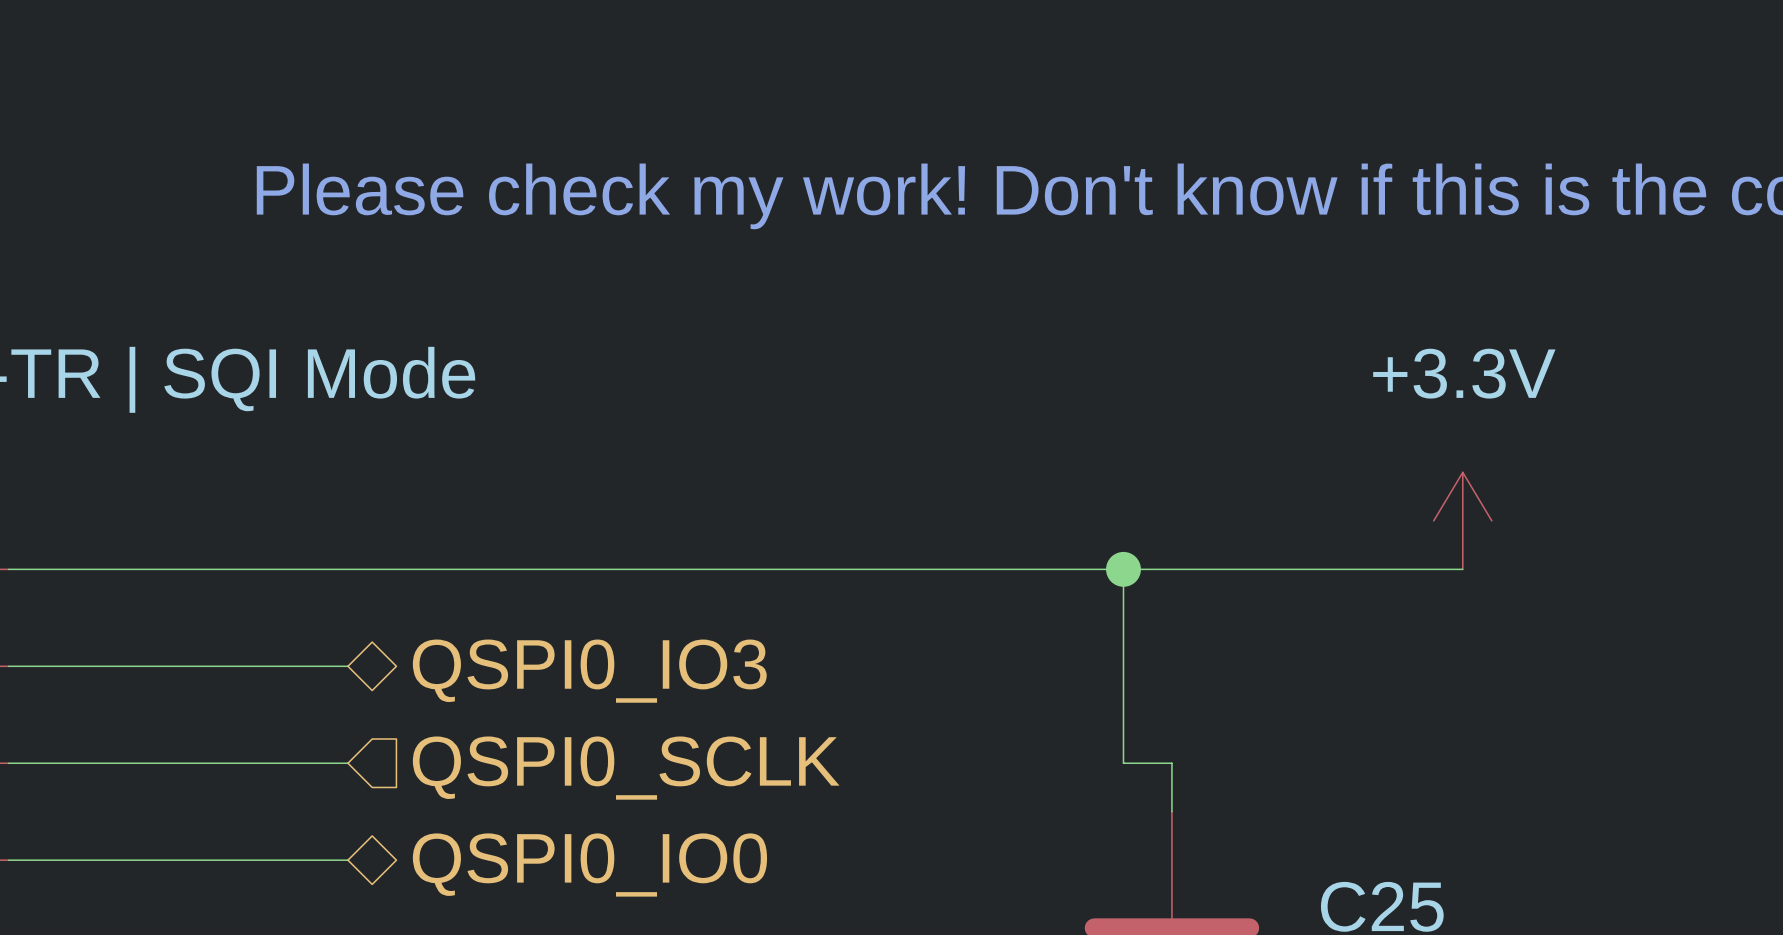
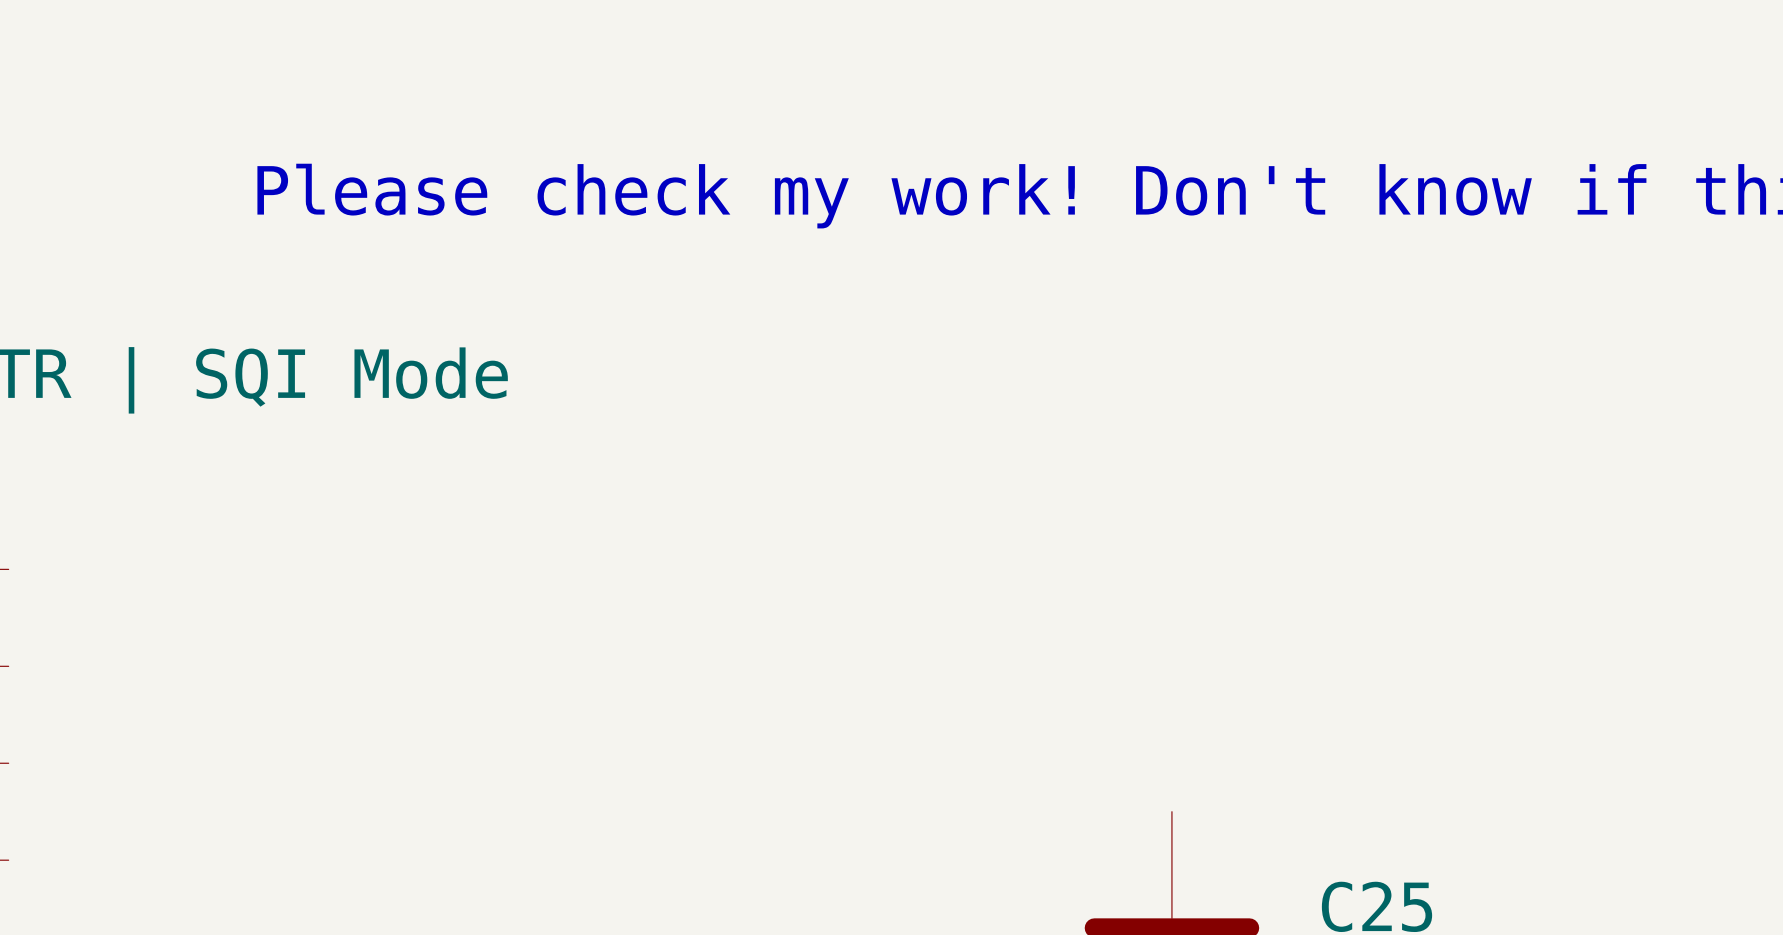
power symbol: +3.3V (1462, 520) -> none
wire: (8, 569) (1462, 569) -> none
wire: (1123, 569) (1123, 763) (1171, 763) (1171, 811) -> none
junction: (1123, 569) -> none
wire: (8, 666) (347, 666) -> none
hierarchical label: QSPI0_IO3 (589, 671) -> none
wire: (8, 763) (347, 763) -> none
hierarchical label: QSPI0_SCLK (626, 768) -> none
wire: (8, 860) (347, 860) -> none
hierarchical label: QSPI0_IO0 (589, 865) -> none

